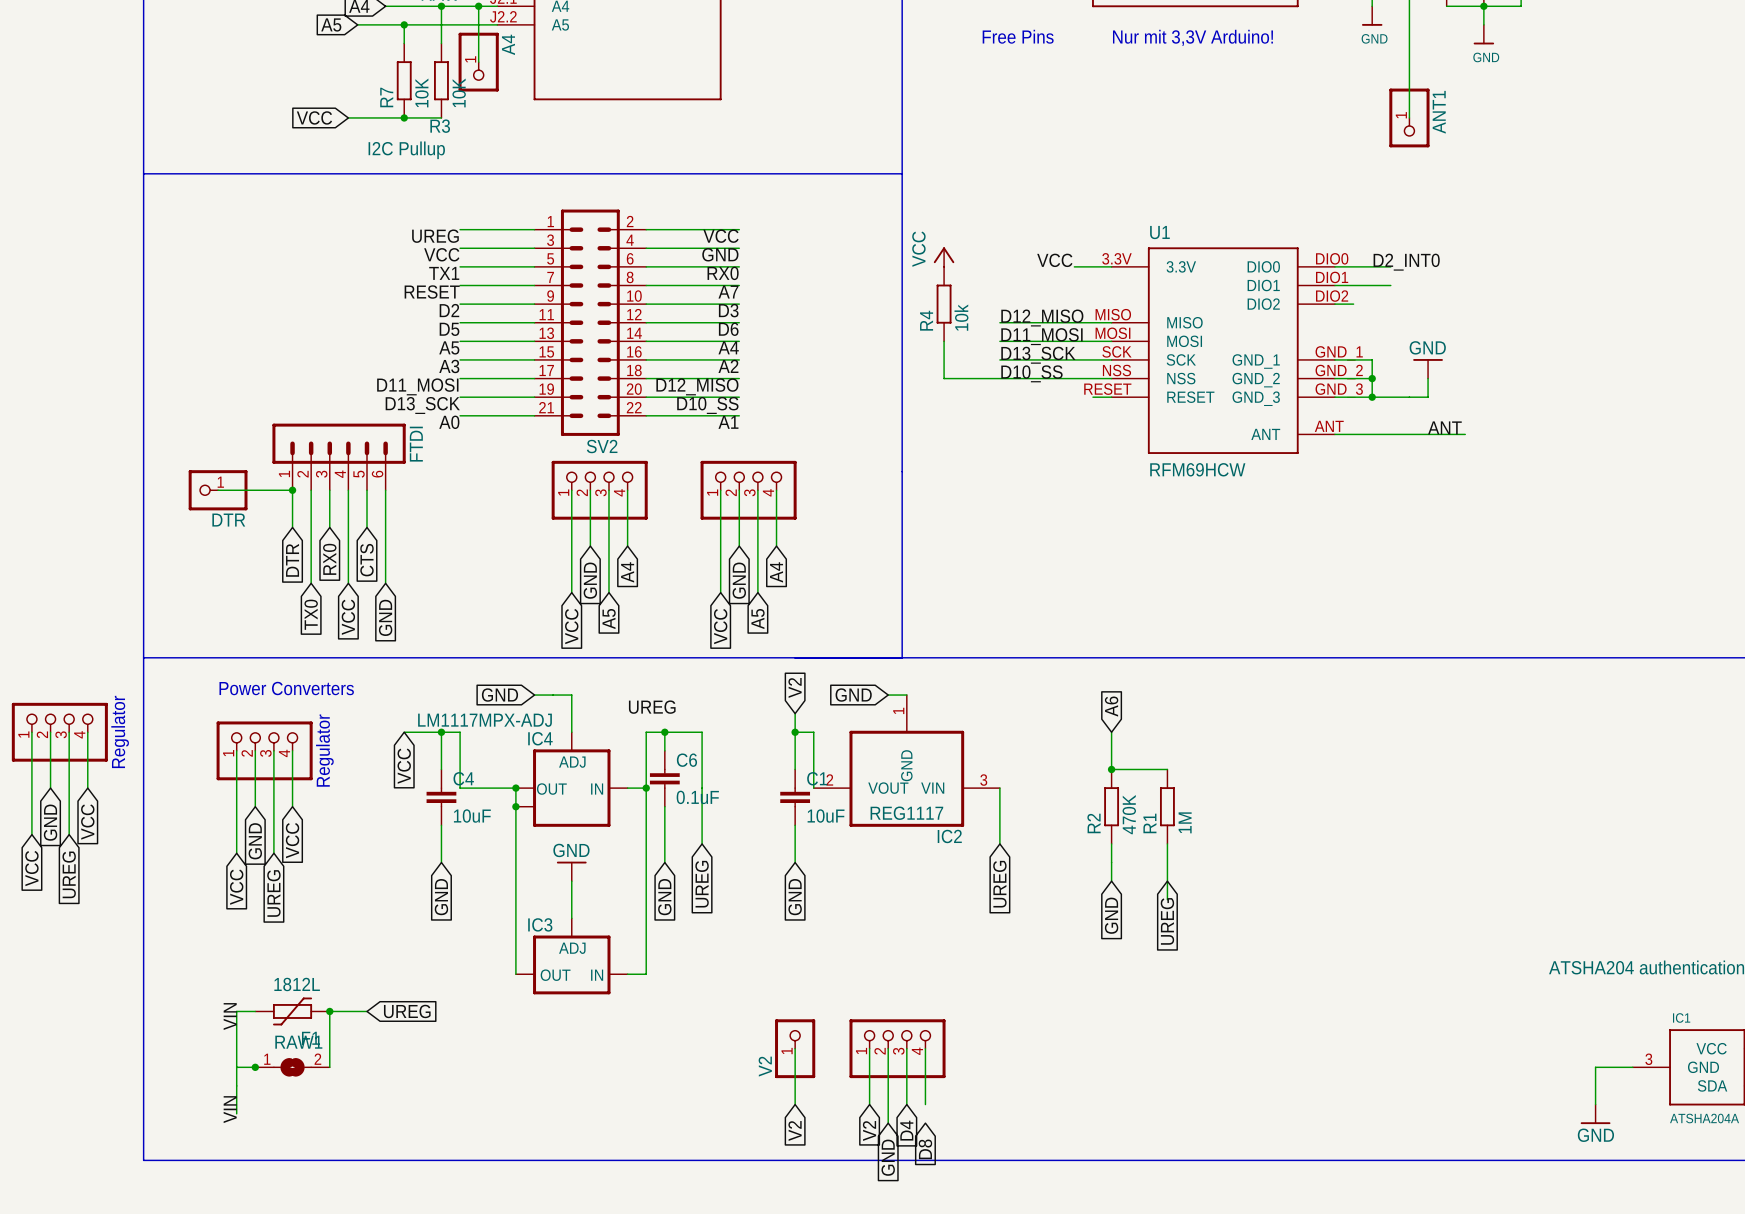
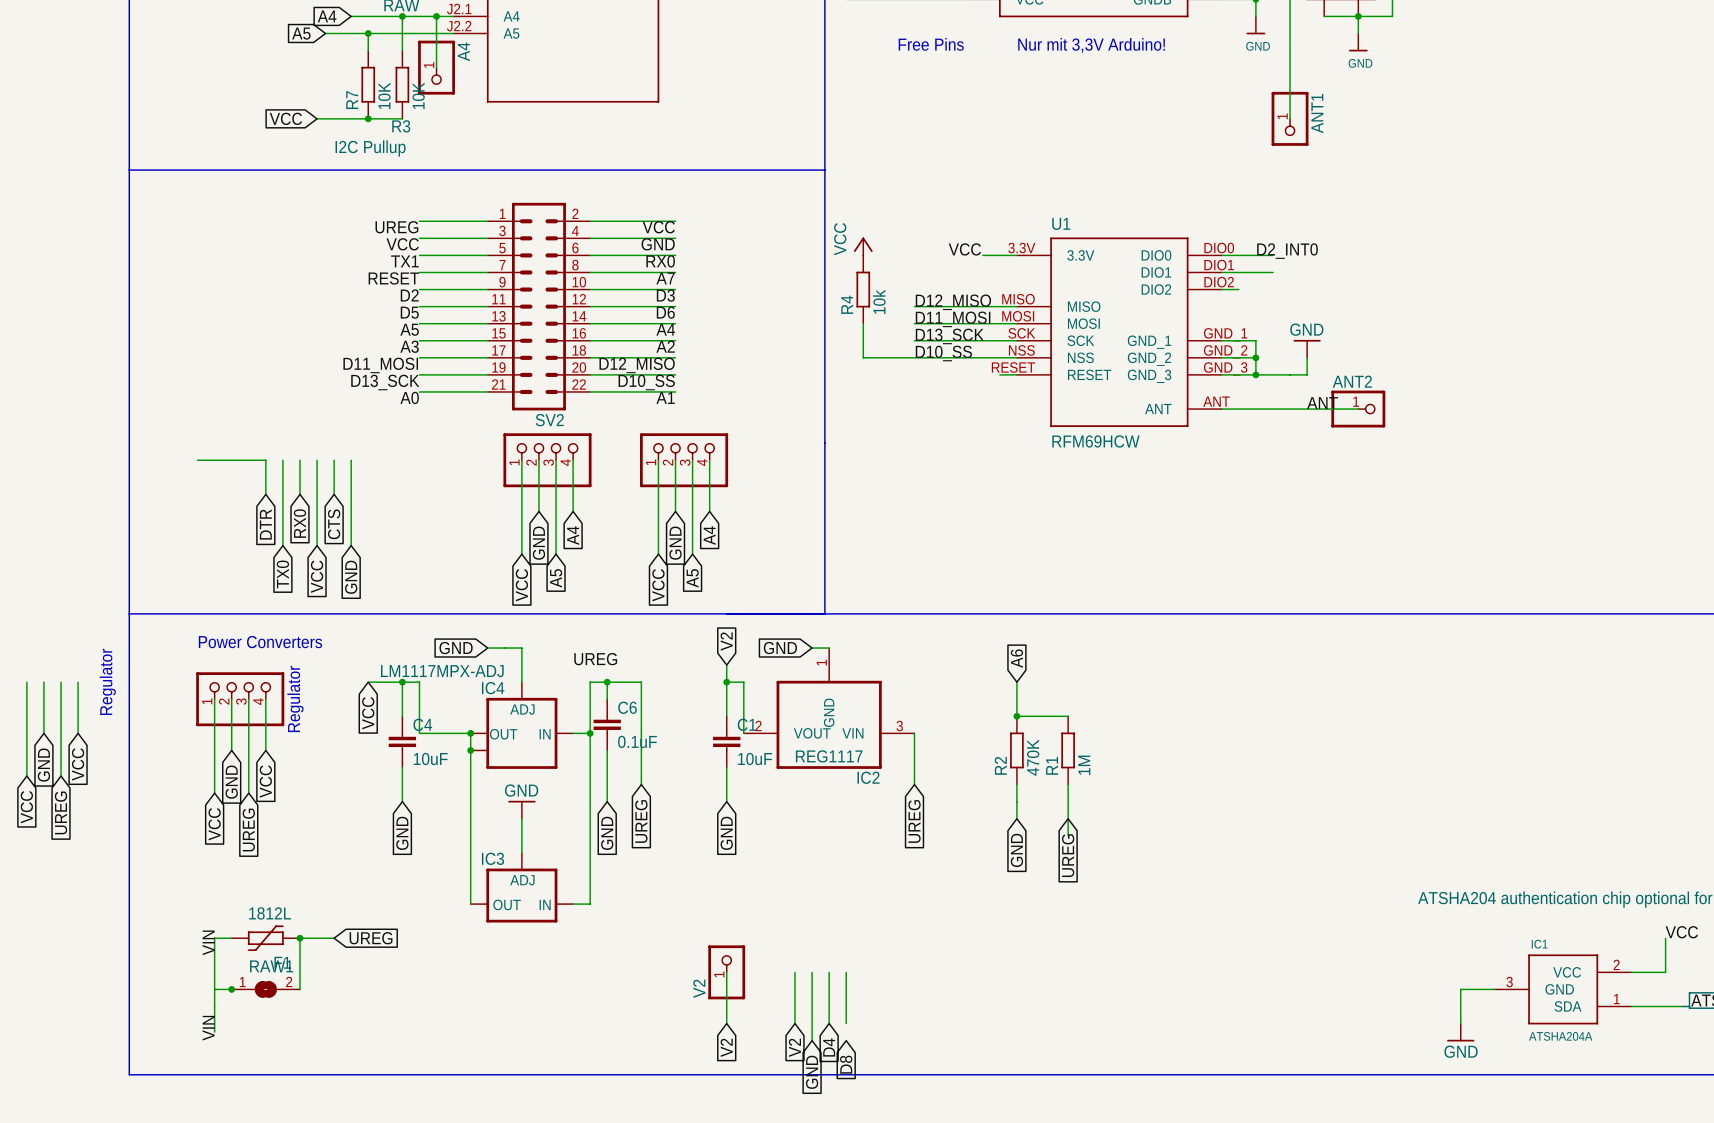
wire: none -> (1341, 409) (1358, 409)
ANT2: none -> (1358, 409)
FTDI: (339, 456) -> none
DTR: (218, 490) -> none
junction: (292, 490) -> none
part: (59, 732) -> none
part: (897, 1048) -> none

